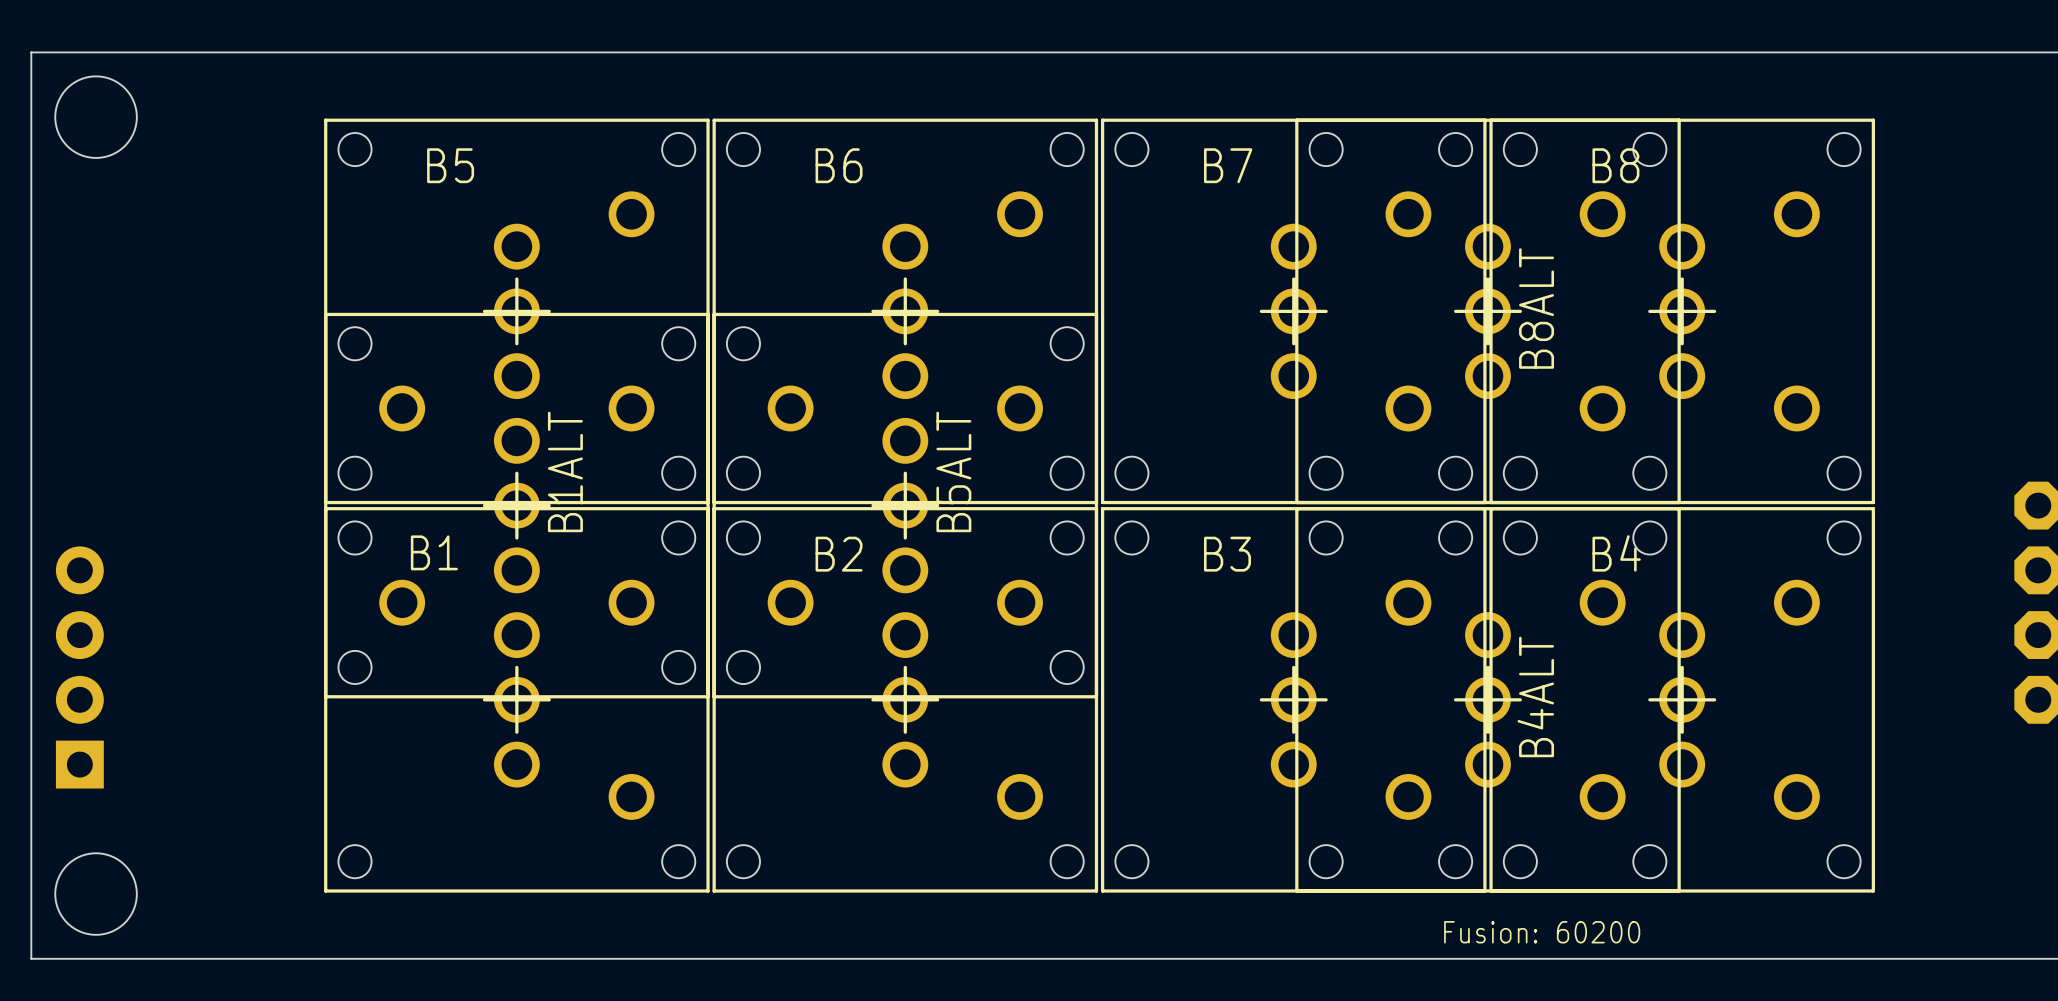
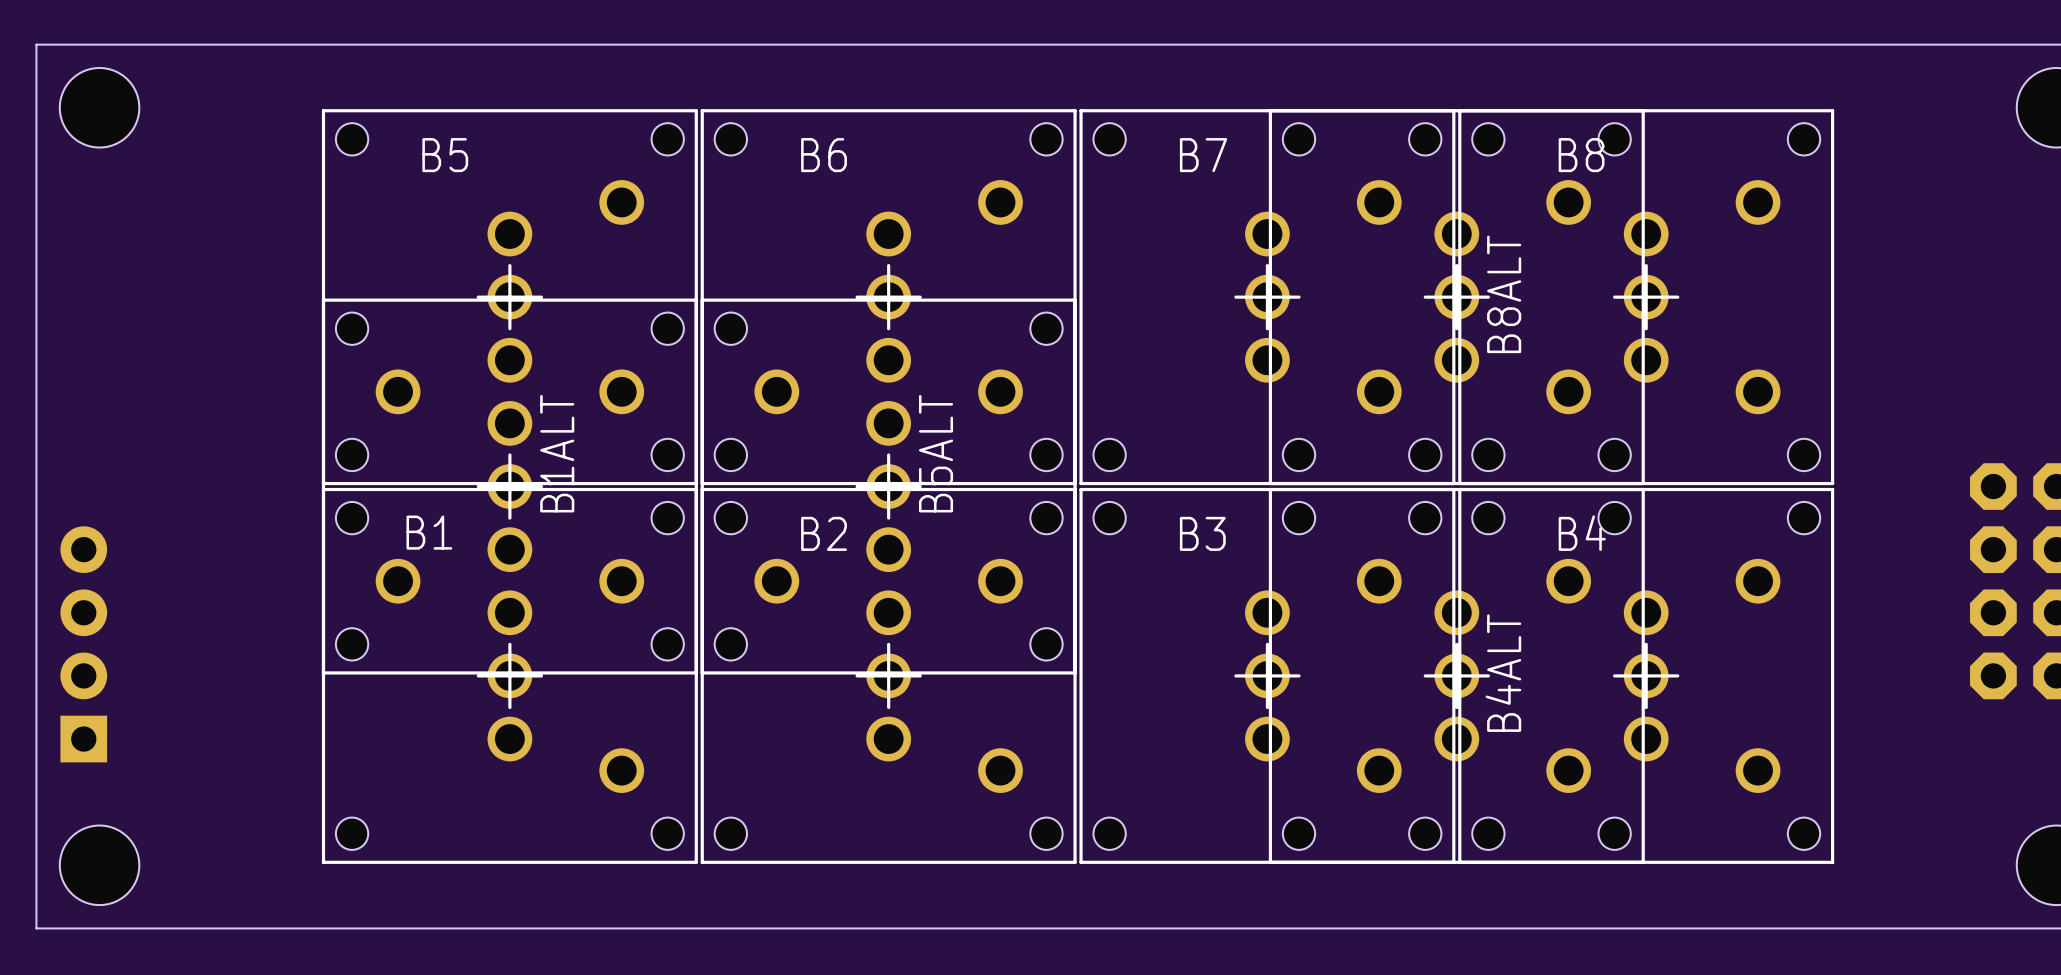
text: Fusion: 60200 (1542, 932) -> none

